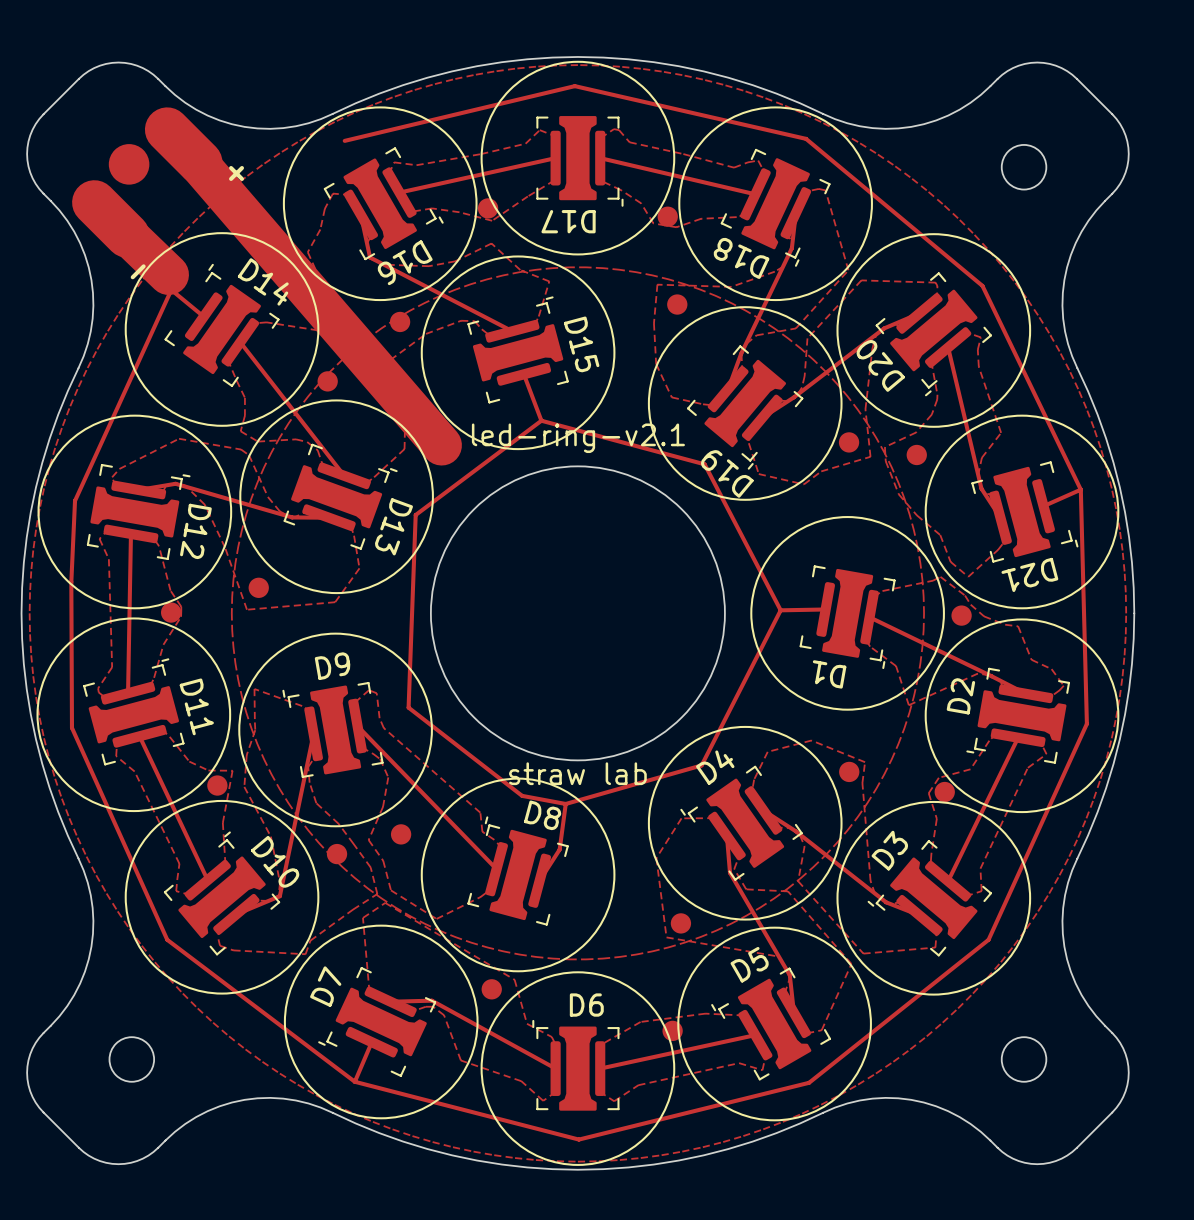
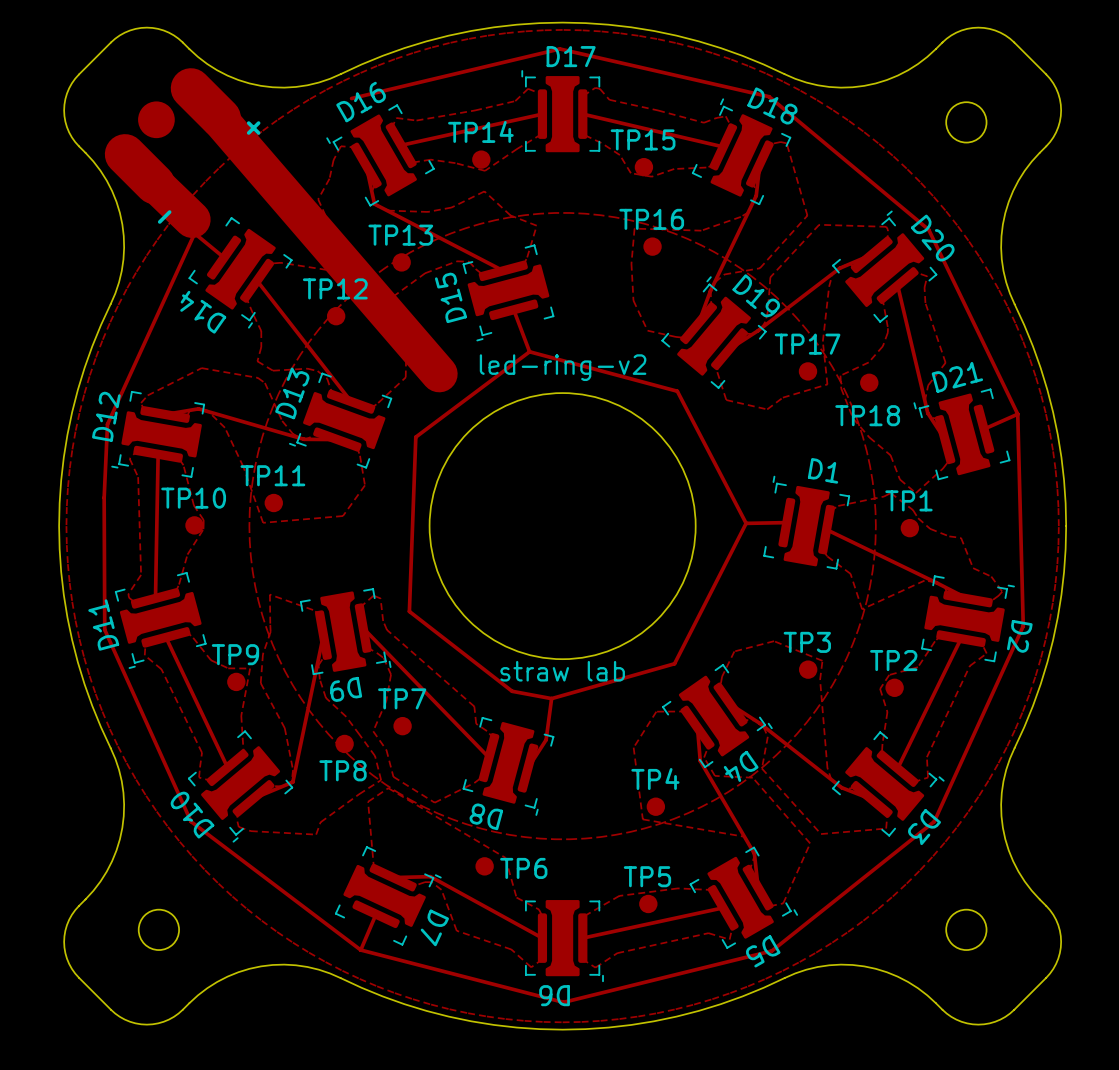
D17 footprint: [480, 60, 676, 256] -> [521, 70, 601, 153]
D16 footprint: [282, 106, 478, 302] -> [326, 104, 435, 207]
D18 footprint: [678, 106, 873, 302] -> [691, 98, 792, 206]
TP14 name: none -> TP14 (480, 131)
TP15 name: none -> TP15 (643, 139)
D17 name position: D17 (568, 221) -> D17 (571, 56)
D14 footprint: [124, 232, 320, 427] -> [188, 217, 293, 329]
D20 footprint: [836, 233, 1032, 428] -> [832, 210, 938, 323]
D15 footprint: [420, 255, 616, 451] -> [462, 244, 555, 342]
D18 name position: D18 (741, 258) -> D18 (772, 105)
D16 name position: D16 (405, 262) -> D16 (361, 102)
TP16 name: none -> TP16 (651, 219)
D14 name position: D14 (263, 281) -> D14 (203, 312)
TP13 name: none -> TP13 (400, 235)
D19 footprint: [647, 306, 843, 501] -> [661, 276, 767, 389]
D15 name position: D15 (581, 344) -> D15 (450, 297)
TP12 name: none -> TP12 (335, 288)
D20 name position: D20 (880, 365) -> D20 (932, 238)
D13 footprint: [239, 399, 434, 595] -> [288, 372, 393, 469]
TP17 name: none -> TP17 (807, 344)
D12 footprint: [37, 414, 233, 610] -> [111, 390, 206, 478]
D21 footprint: [924, 414, 1120, 610] -> [913, 388, 1011, 481]
text: led-ring-v2.1 (578, 438) -> led-ring-v2 (563, 367)
D19 name position: D19 (727, 473) -> D19 (756, 295)
TP18 name: none -> TP18 (867, 415)
D1 footprint: [750, 516, 945, 711] -> [763, 475, 851, 570]
D13 name position: D13 (393, 526) -> D13 (292, 393)
D12 name position: D12 (195, 531) -> D12 (106, 416)
TP11 name: none -> TP11 (272, 475)
D21 name position: D21 (1029, 574) -> D21 (957, 377)
TP10 name: none -> TP10 (193, 498)
TP1 name: none -> TP1 (908, 500)
D11 footprint: [36, 617, 232, 813] -> [114, 572, 207, 669]
D2 footprint: [924, 618, 1120, 814] -> [921, 575, 1015, 663]
D9 footprint: [238, 632, 433, 828] -> [299, 588, 392, 676]
D9 name position: D9 (332, 666) -> D9 (346, 689)
D1 name position: D1 (829, 674) -> D1 (823, 470)
D2 name position: D2 (960, 696) -> D2 (1019, 636)
D11 name position: D11 (196, 706) -> D11 (103, 625)
D4 footprint: [647, 725, 843, 921] -> [661, 664, 773, 769]
TP3 name: none -> TP3 (807, 642)
TP9 name: none -> TP9 (235, 654)
TP2 name: none -> TP2 (893, 660)
D4 name position: D4 (715, 767) -> D4 (741, 766)
D8 footprint: [420, 777, 616, 973] -> [462, 716, 555, 816]
D10 footprint: [124, 799, 320, 995] -> [187, 730, 294, 843]
D3 footprint: [836, 800, 1032, 996] -> [832, 731, 945, 837]
TP7 name: none -> TP7 (402, 698)
D8 name position: D8 (542, 815) -> D8 (486, 816)
D3 name position: D3 (889, 850) -> D3 (924, 827)
D10 name position: D10 (275, 861) -> D10 (192, 815)
TP8 name: none -> TP8 (343, 770)
TP4 name: none -> TP4 (655, 779)
D7 footprint: [283, 924, 479, 1120] -> [334, 846, 442, 946]
D5 footprint: [677, 926, 872, 1122] -> [689, 846, 799, 949]
D5 name position: D5 (749, 964) -> D5 (763, 951)
D6 footprint: [480, 971, 676, 1166] -> [525, 900, 604, 983]
D7 name position: D7 (325, 986) -> D7 (434, 927)
TP6 name: none -> TP6 (523, 868)
TP5 name: none -> TP5 (647, 876)
D6 name position: D6 (586, 1005) -> D6 (554, 995)

